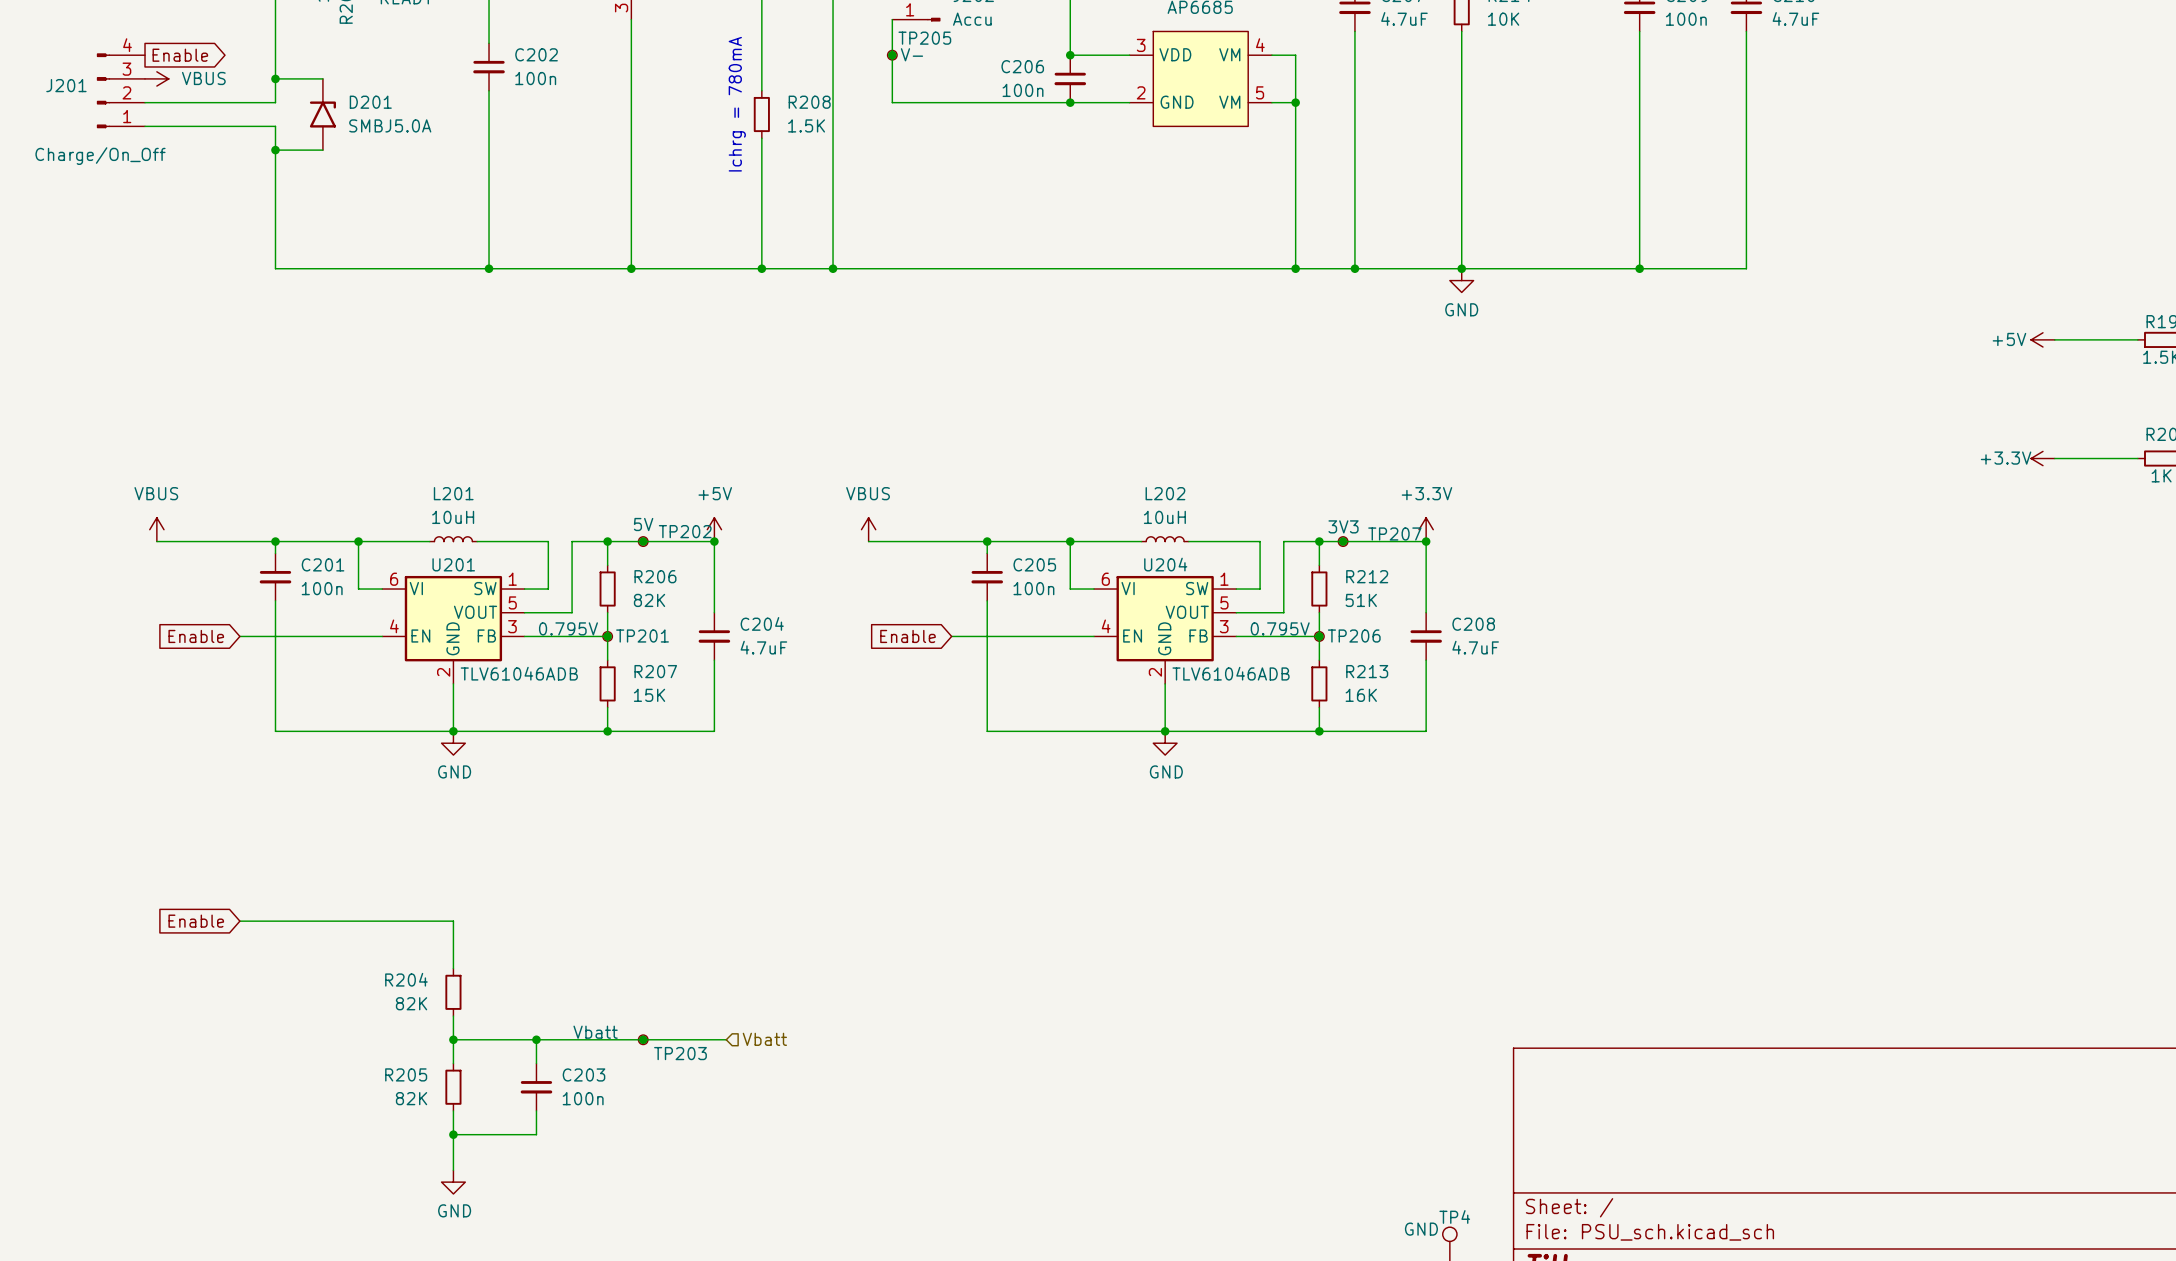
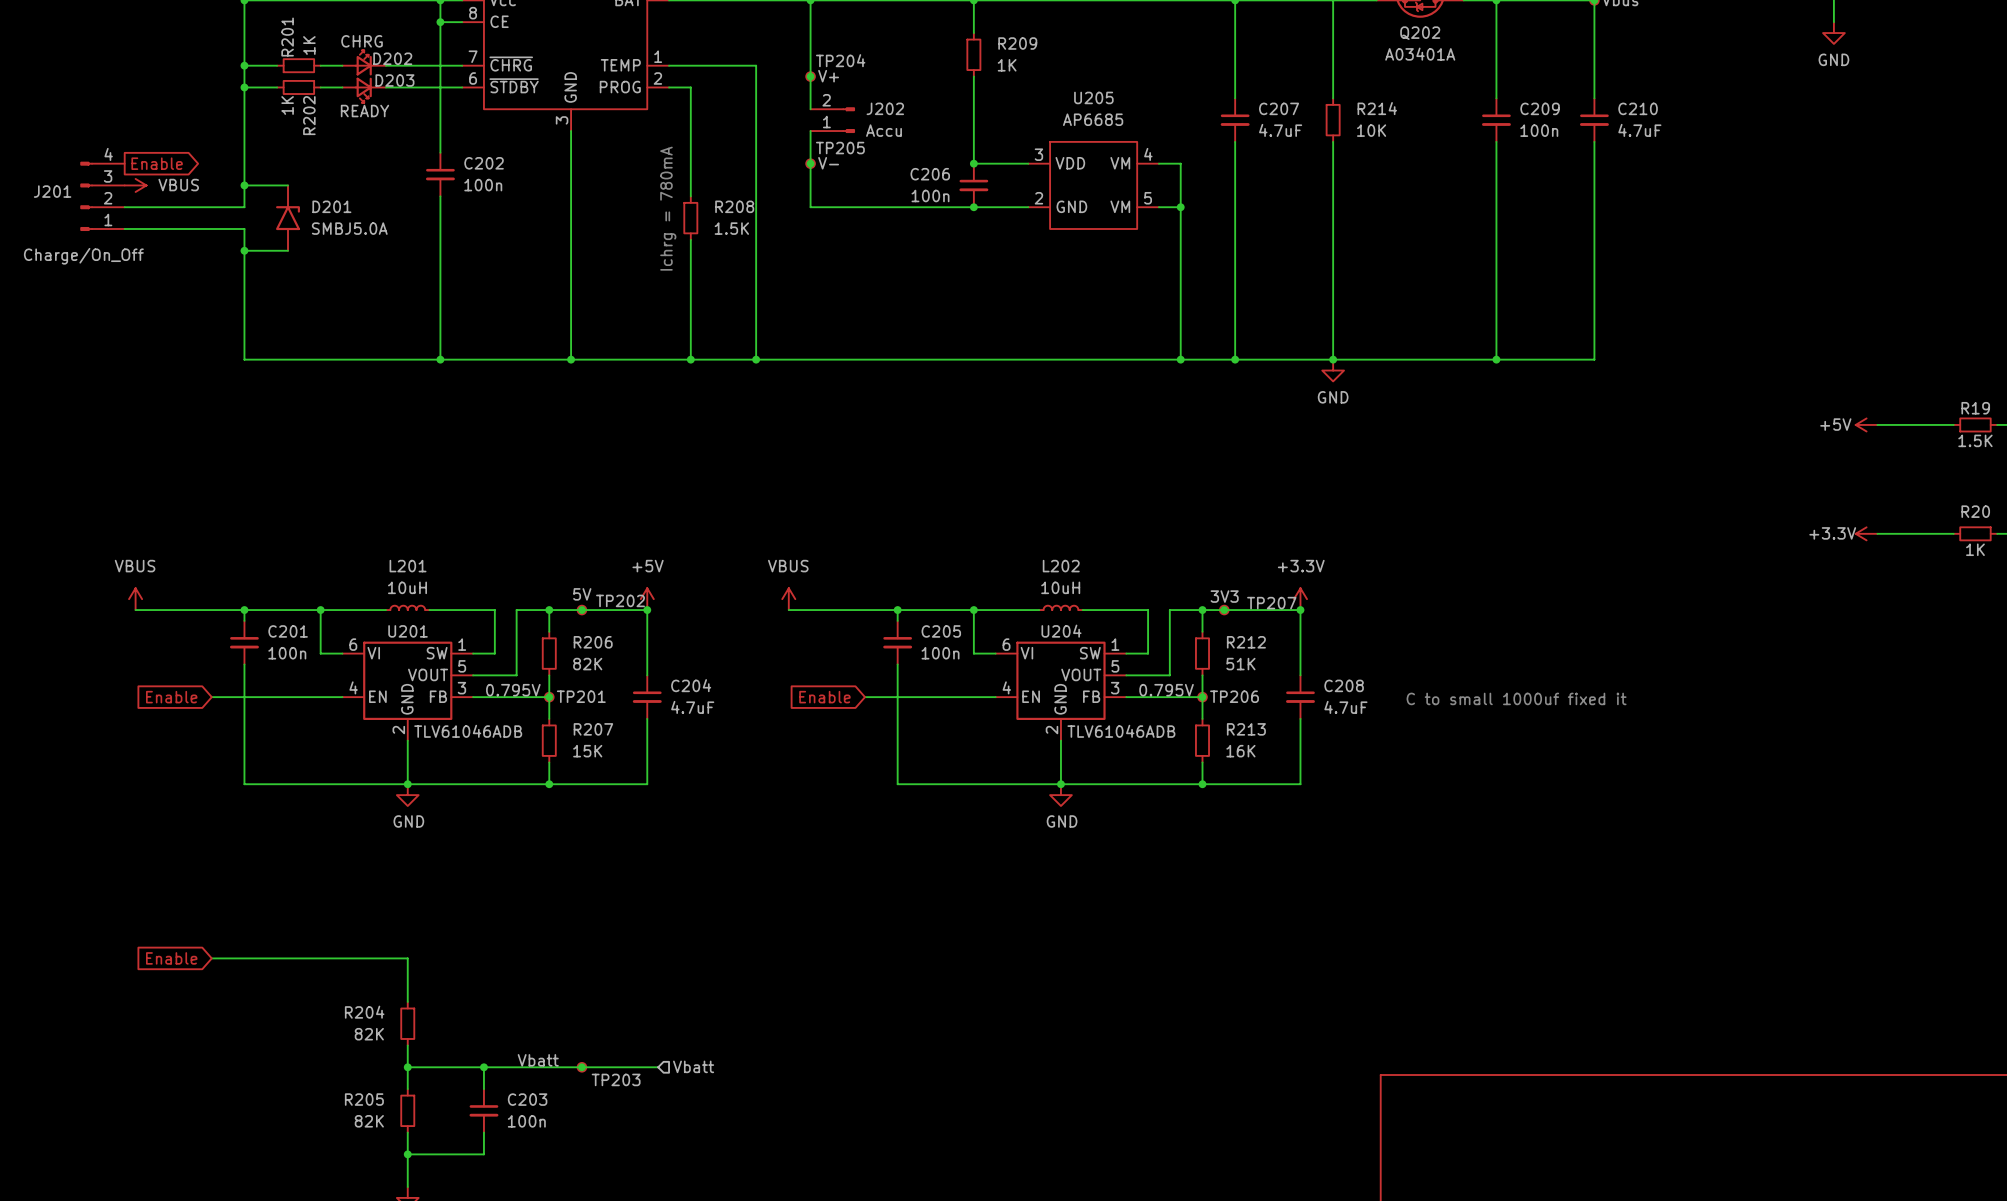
text: none -> C to small 1000uf fixed it (1516, 698)

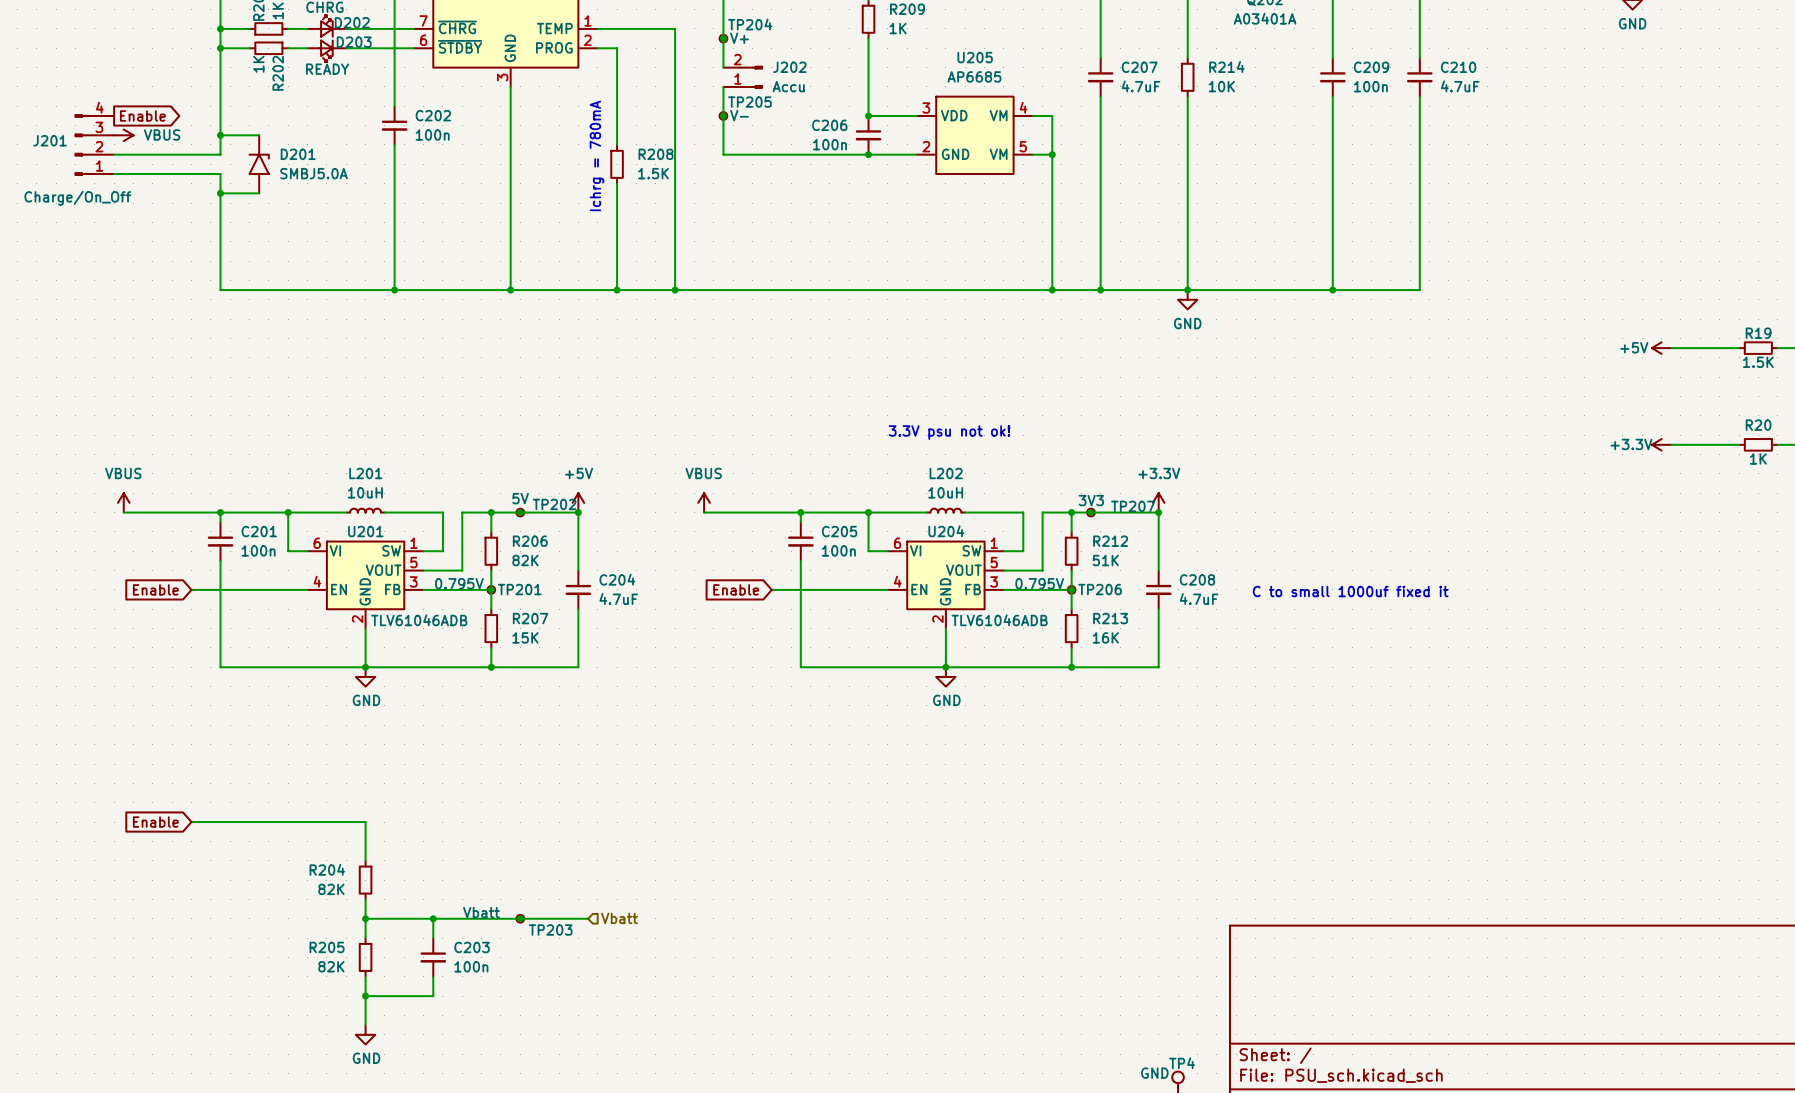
text: none -> 3.3V psu not ok! (949, 432)

